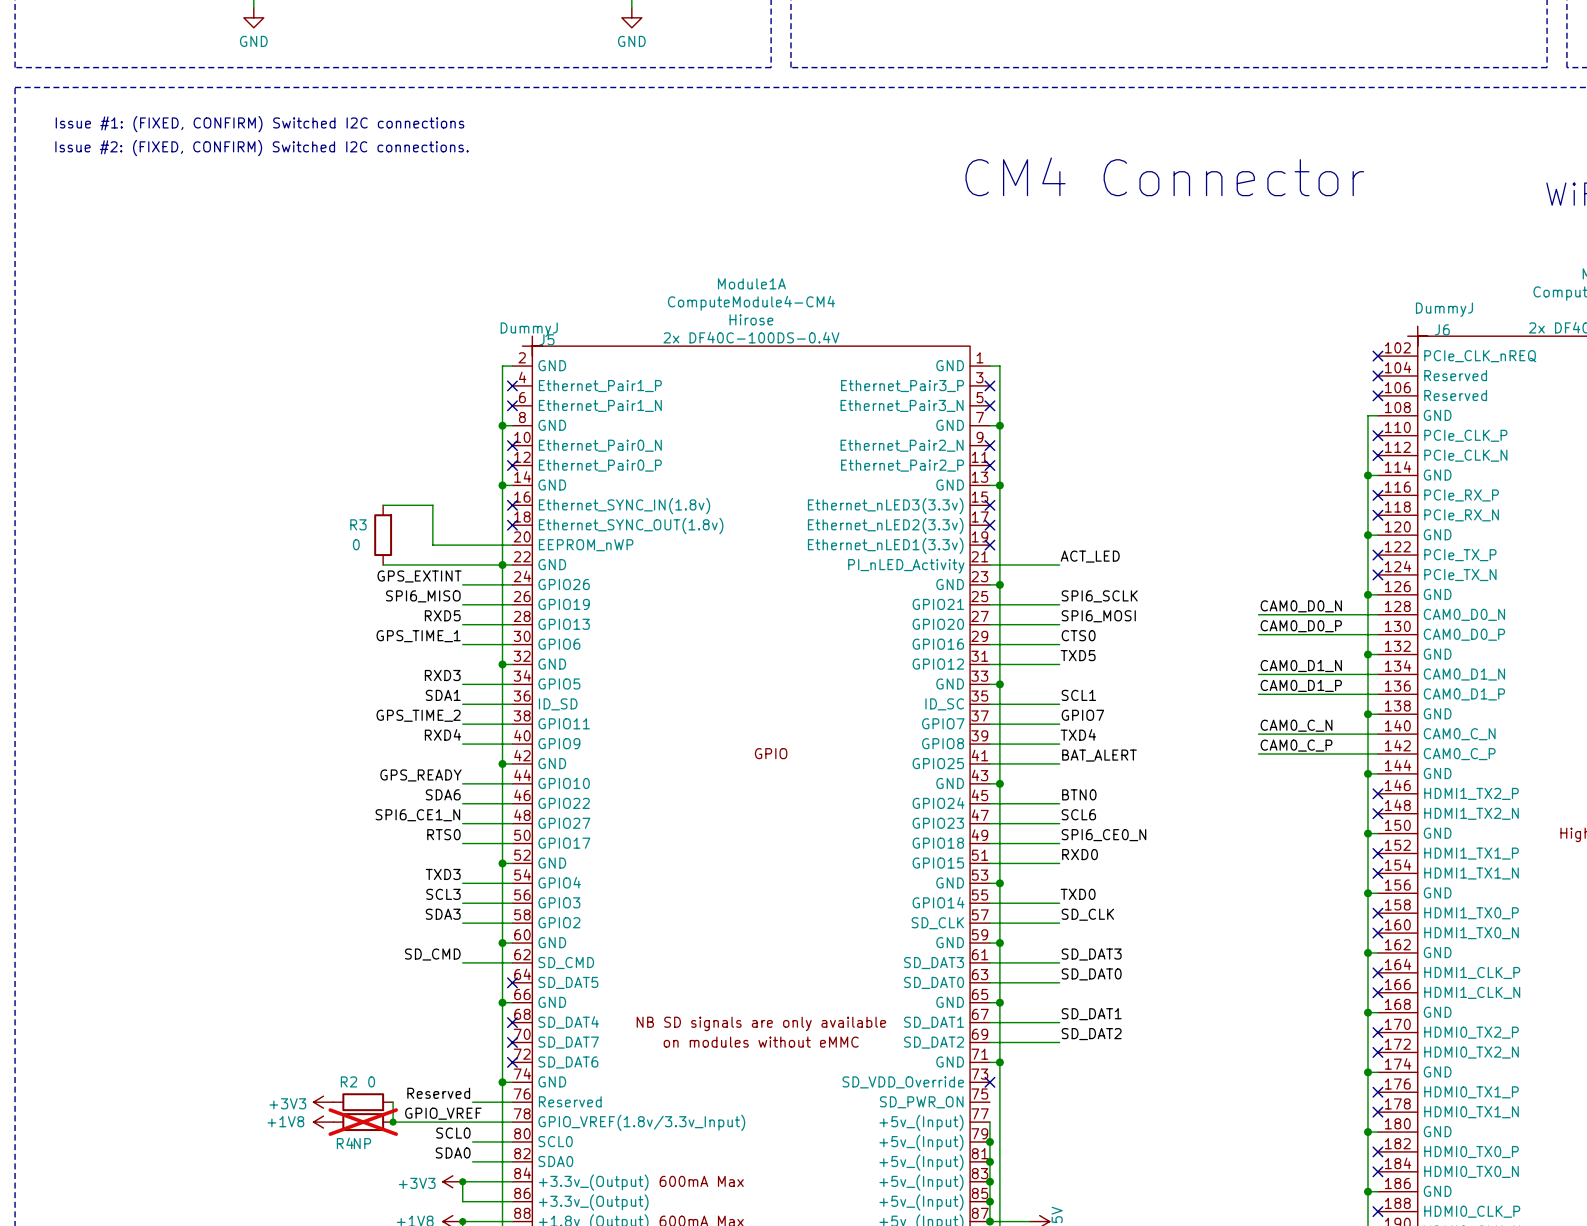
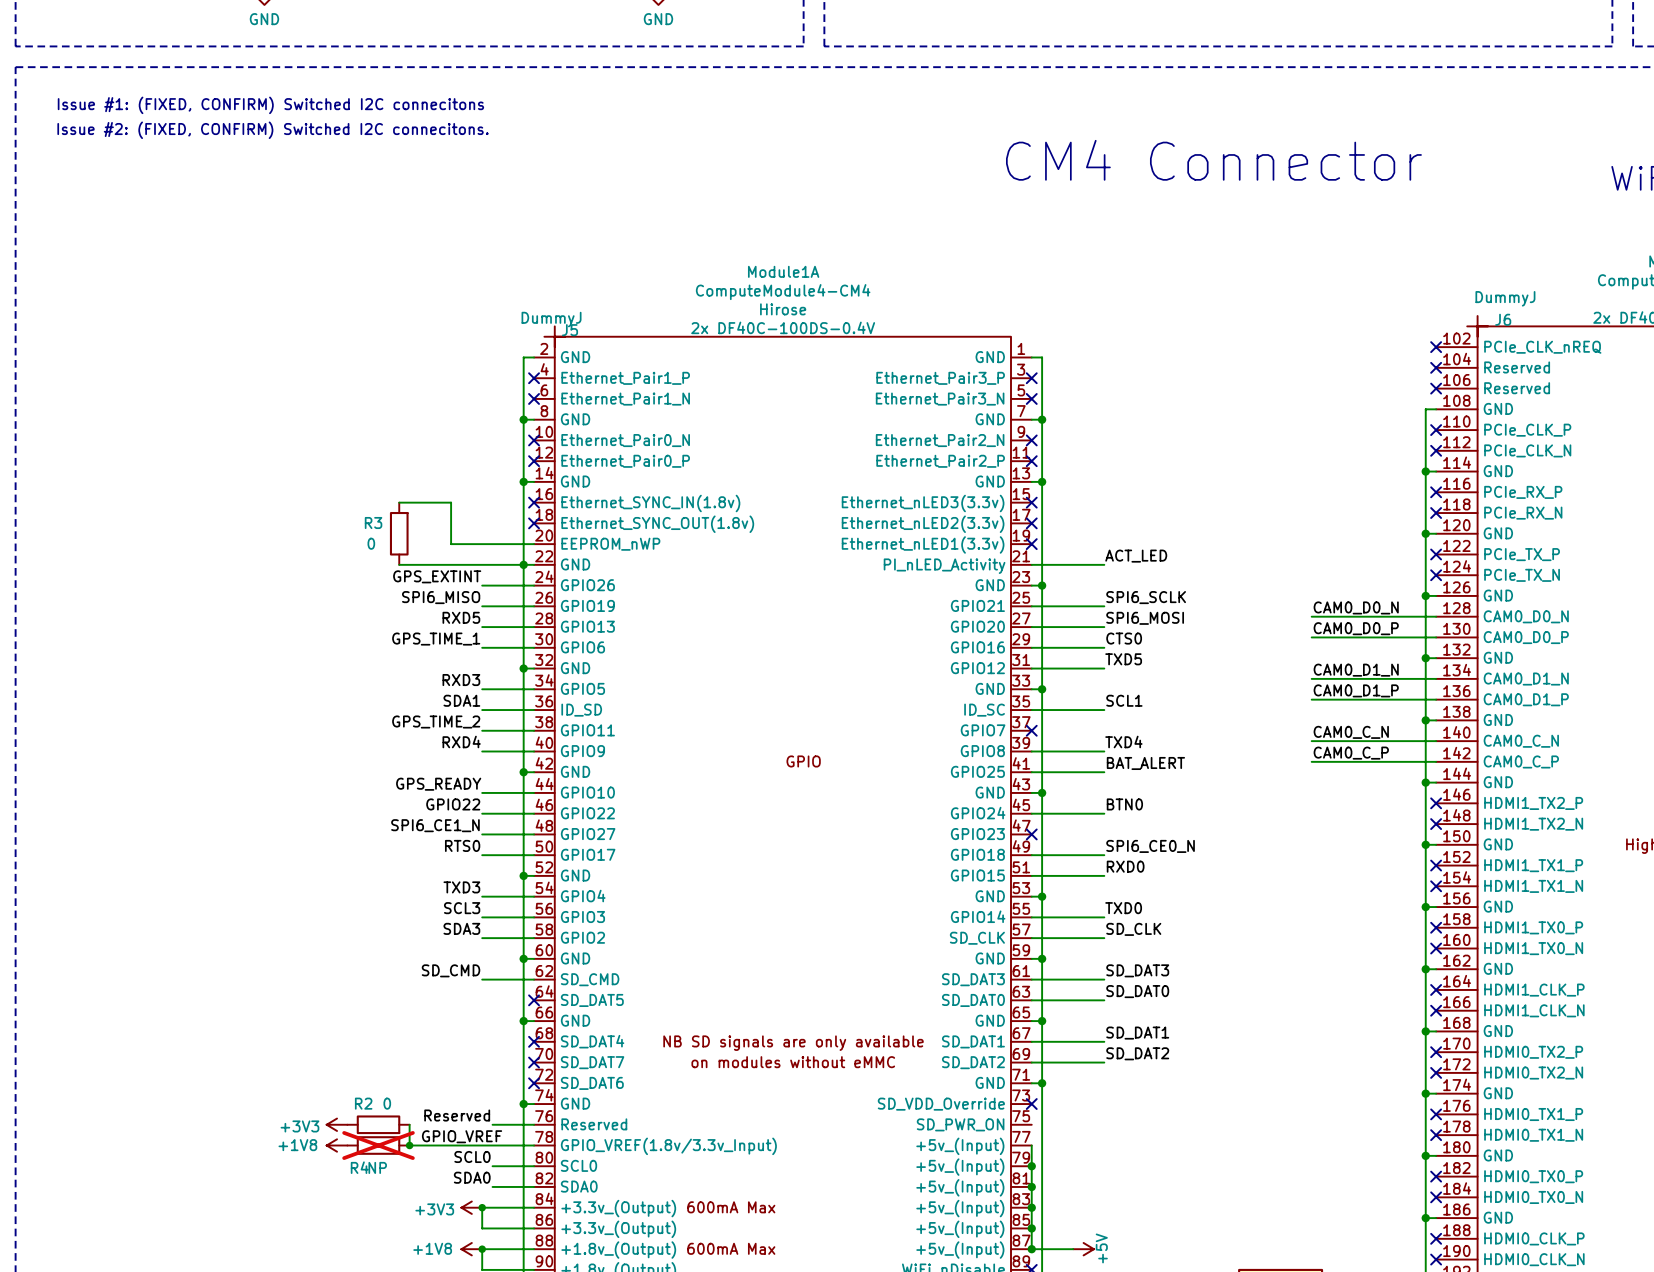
text: Issue #1: (FIXED, CONFIRM) Switched I2C connections (260, 124) -> Issue #1: (FIXED, CONFIRM) Switched I2C connecitons (270, 105)
text: Issue #2: (FIXED, CONFIRM) Switched I2C connections. (262, 148) -> Issue #2: (FIXED, CONFIRM) Switched I2C connecitons. (273, 130)
label: GPIO7 (1082, 715) -> none
wire: (989, 724) (1059, 724) -> none
no-connect mark: none -> (1031, 730)
label: SDA6 (443, 794) -> GPIO22 (453, 804)
label: SCL6 (1078, 814) -> none
wire: (989, 823) (1059, 823) -> none
no-connect mark: none -> (1031, 834)

